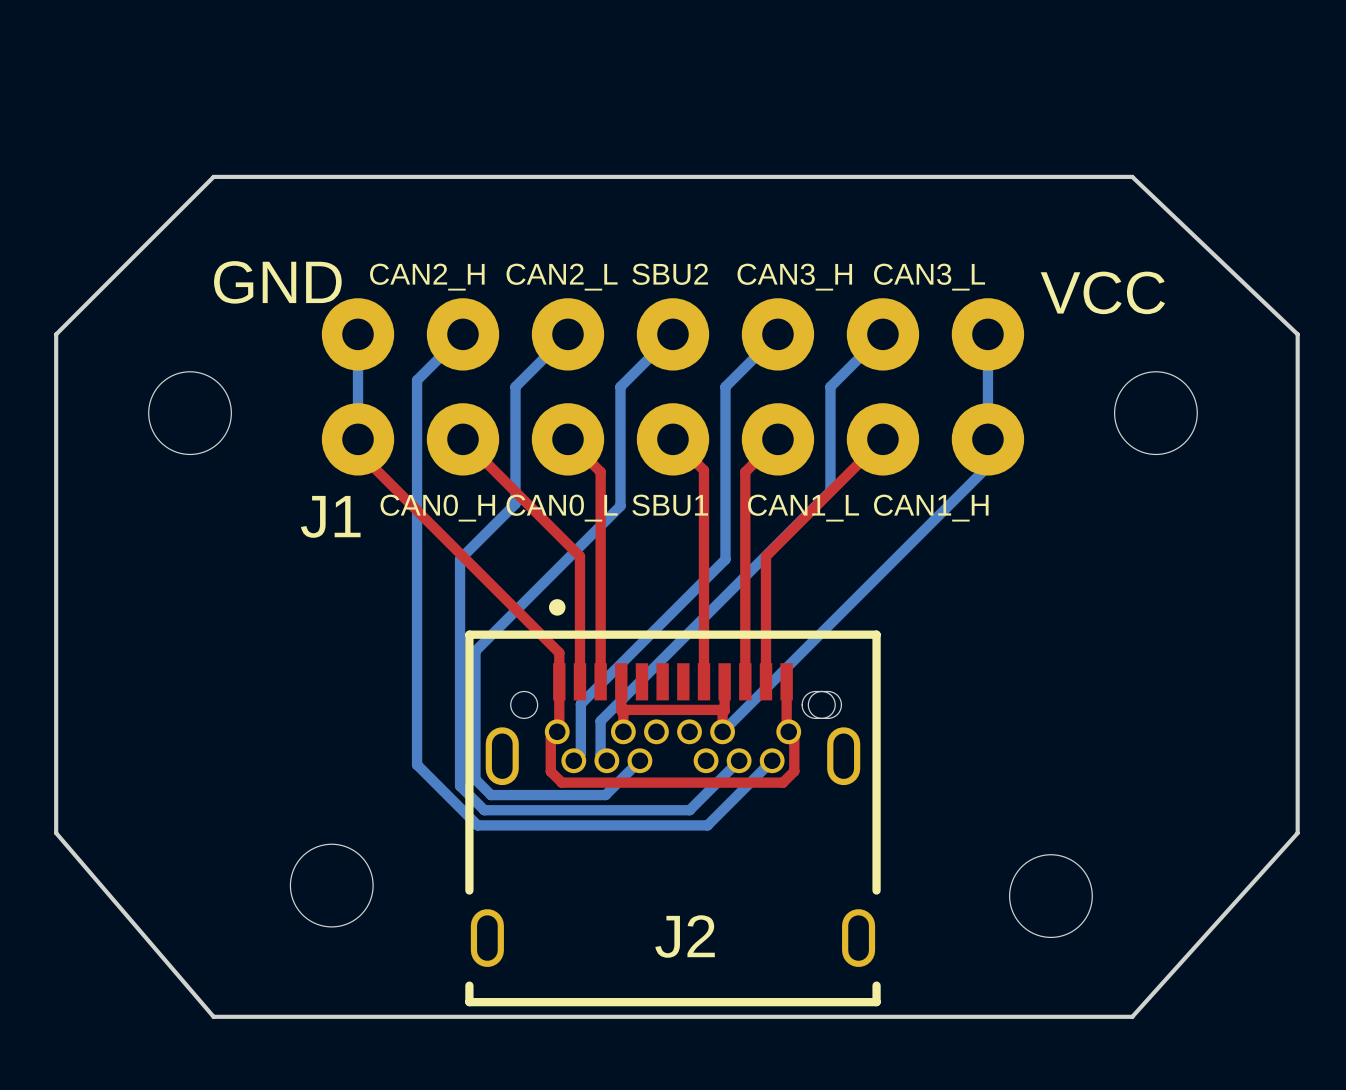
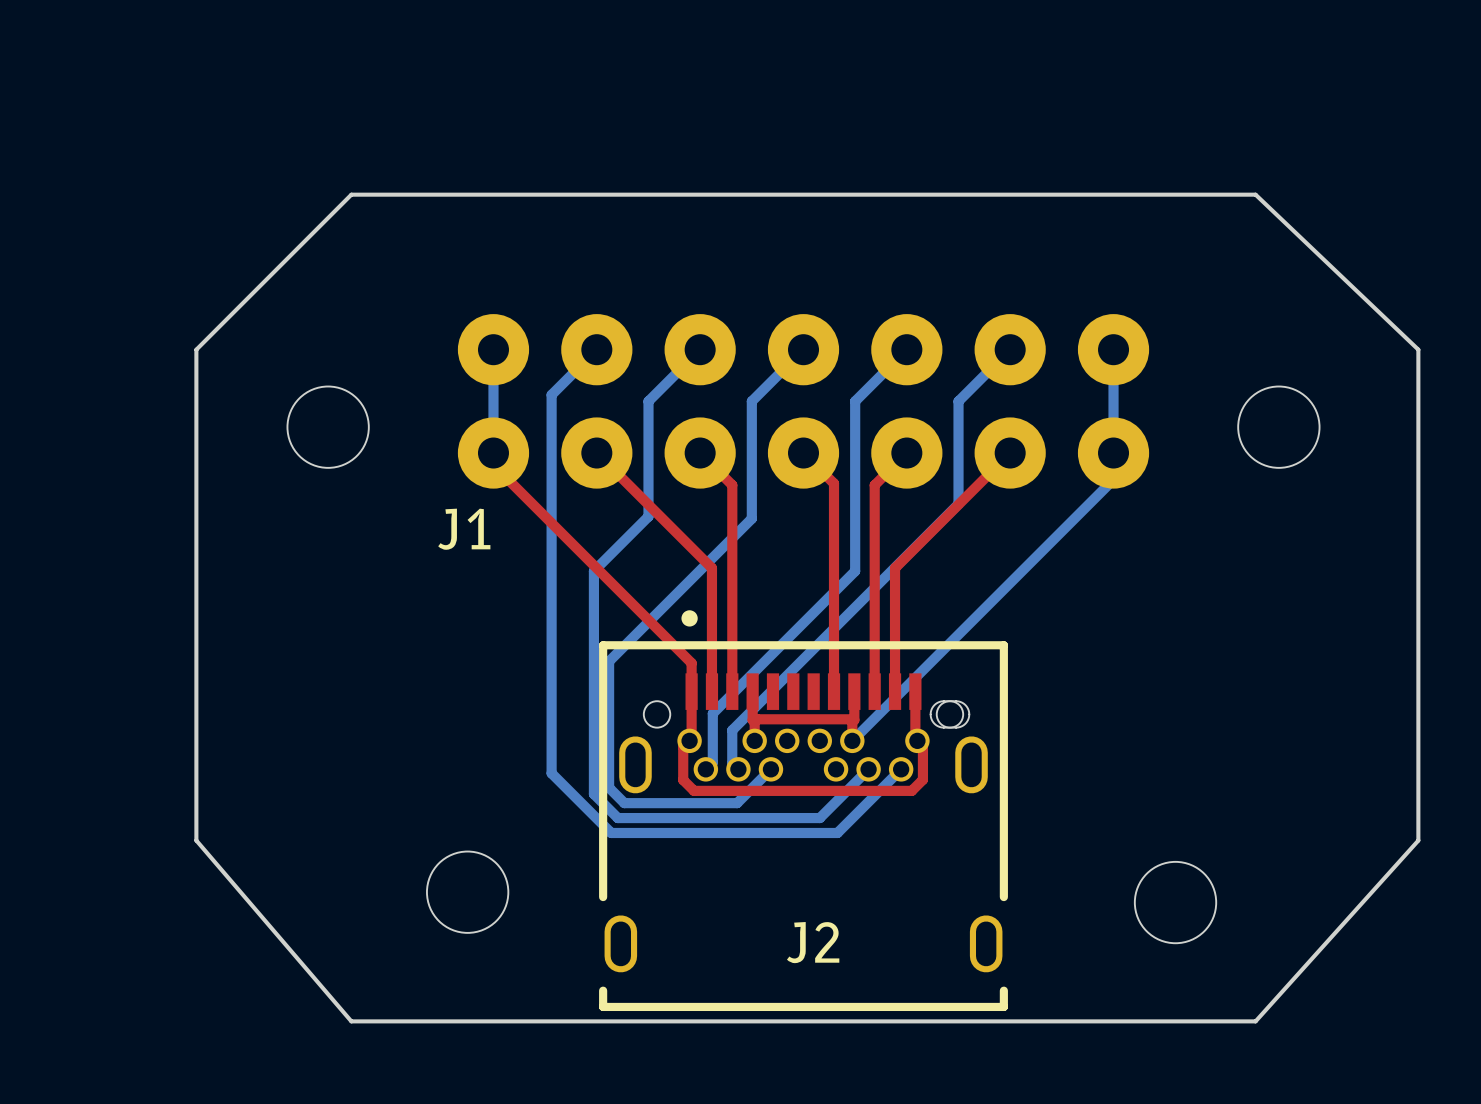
J1 footprint: [321, 298, 1025, 476] -> [457, 314, 1150, 489]

